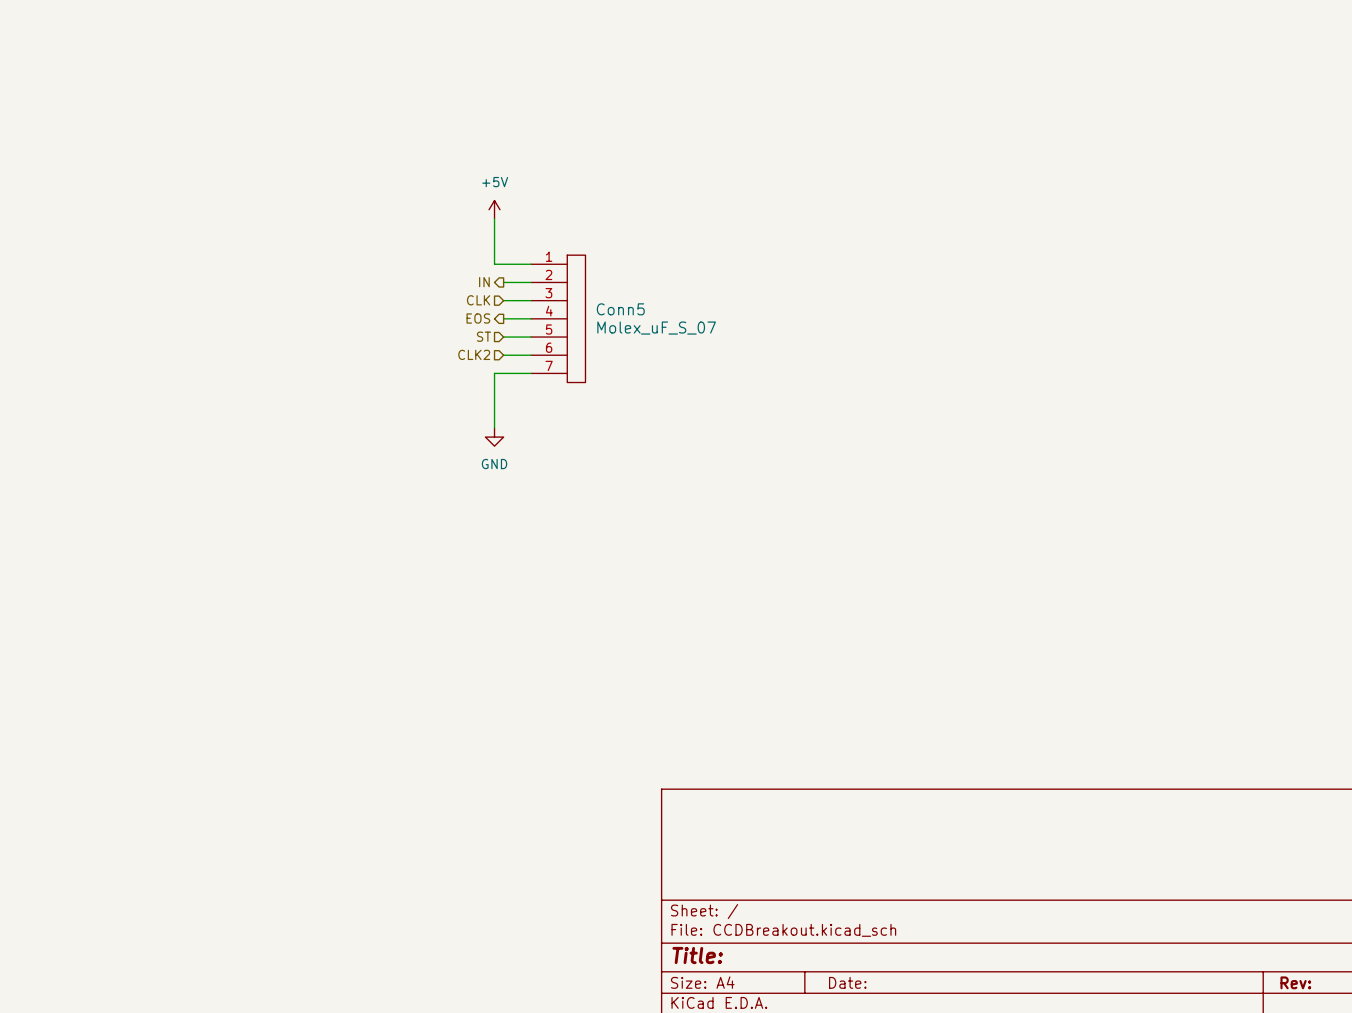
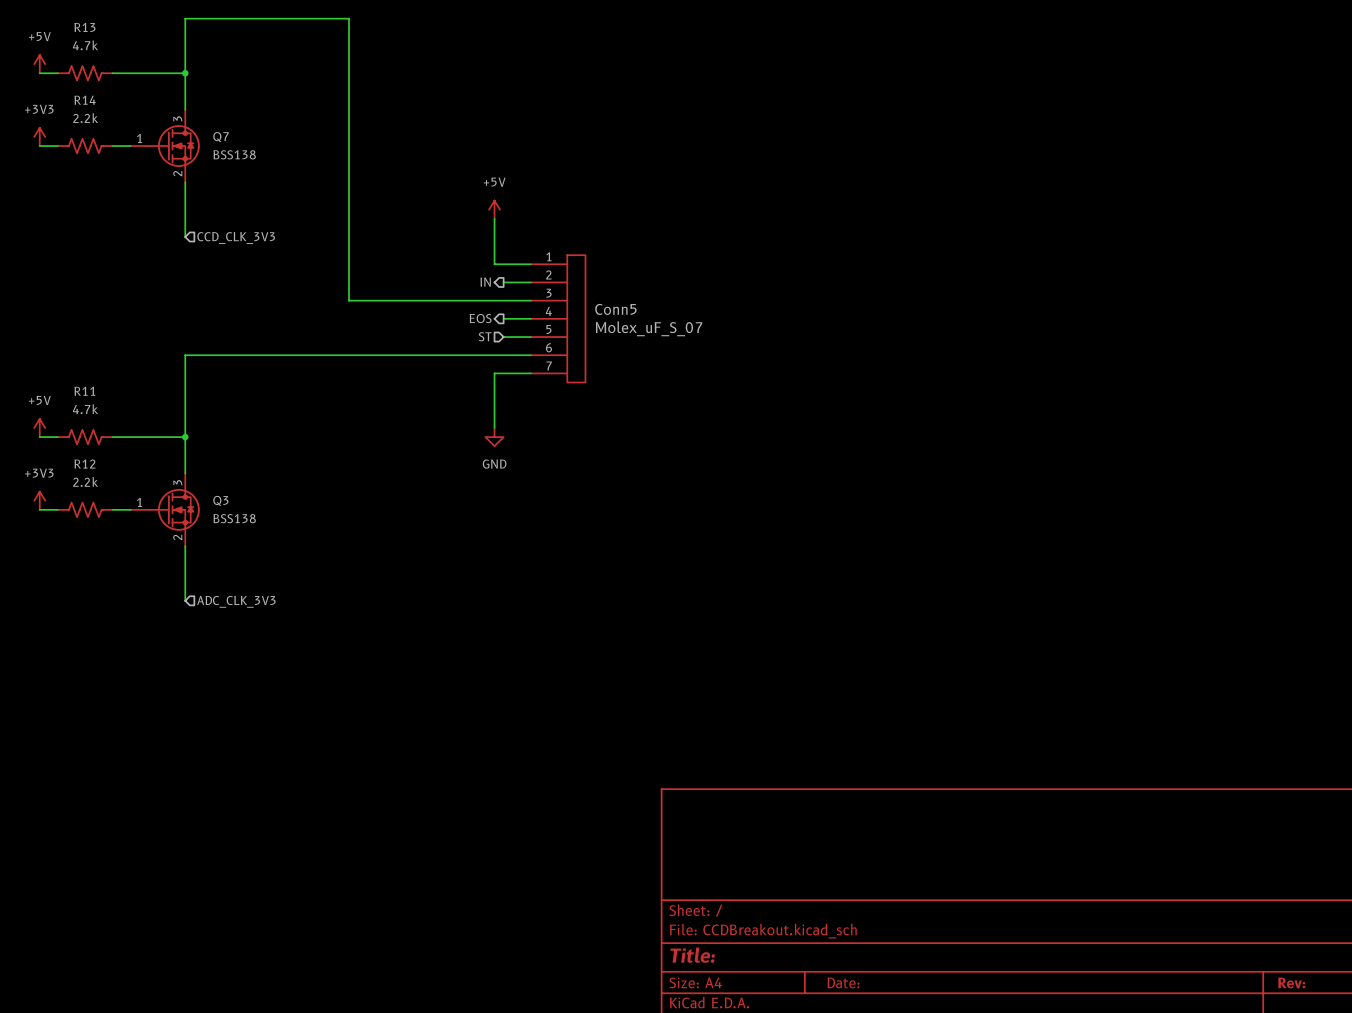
power symbol: none -> +5V (39, 64)
wire: none -> (39, 73) (57, 73)
R13: none -> 4.7k (85, 73)
wire: none -> (112, 73) (185, 73)
junction: none -> (185, 73)
wire: none -> (185, 109) (185, 18) (348, 18) (348, 300) (503, 300)
power symbol: none -> +3V3 (39, 136)
wire: none -> (39, 146) (57, 146)
R14: none -> 2.2k (85, 146)
wire: none -> (112, 146) (130, 146)
Q7: none -> BSS138 (165, 146)
wire: none -> (185, 182) (185, 236)
hierarchical label: none -> CCD_CLK_3V3 (236, 238)
hierarchical label: CLK (478, 300) -> none
hierarchical label: CLK2 (474, 354) -> none
wire: none -> (503, 355) (185, 355) (185, 473)
power symbol: none -> +5V (39, 427)
wire: none -> (39, 437) (57, 437)
R11: none -> 4.7k (85, 437)
wire: none -> (112, 437) (185, 437)
junction: none -> (185, 437)
power symbol: none -> +3V3 (39, 500)
wire: none -> (39, 509) (57, 509)
R12: none -> 2.2k (85, 509)
wire: none -> (112, 509) (130, 509)
Q3: none -> BSS138 (165, 509)
wire: none -> (185, 546) (185, 600)
hierarchical label: none -> ADC_CLK_3V3 (236, 601)

